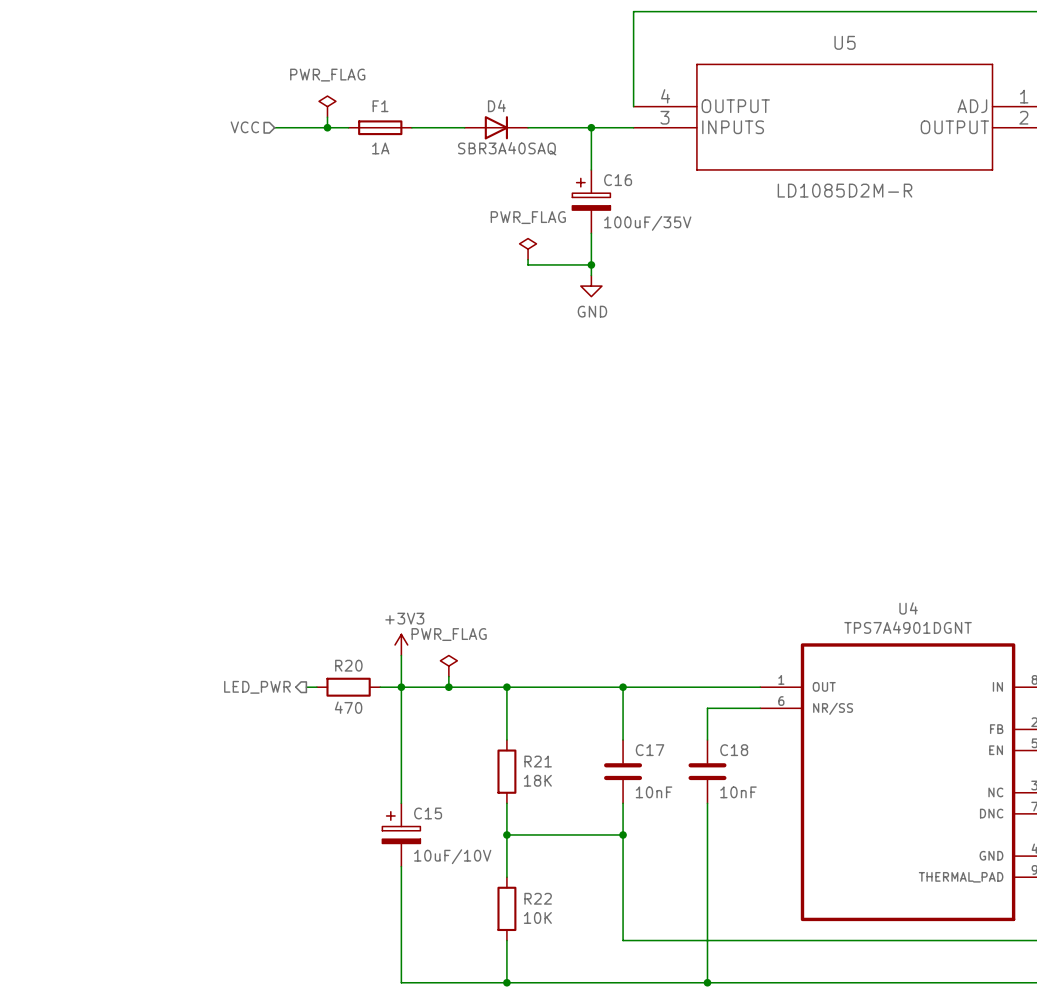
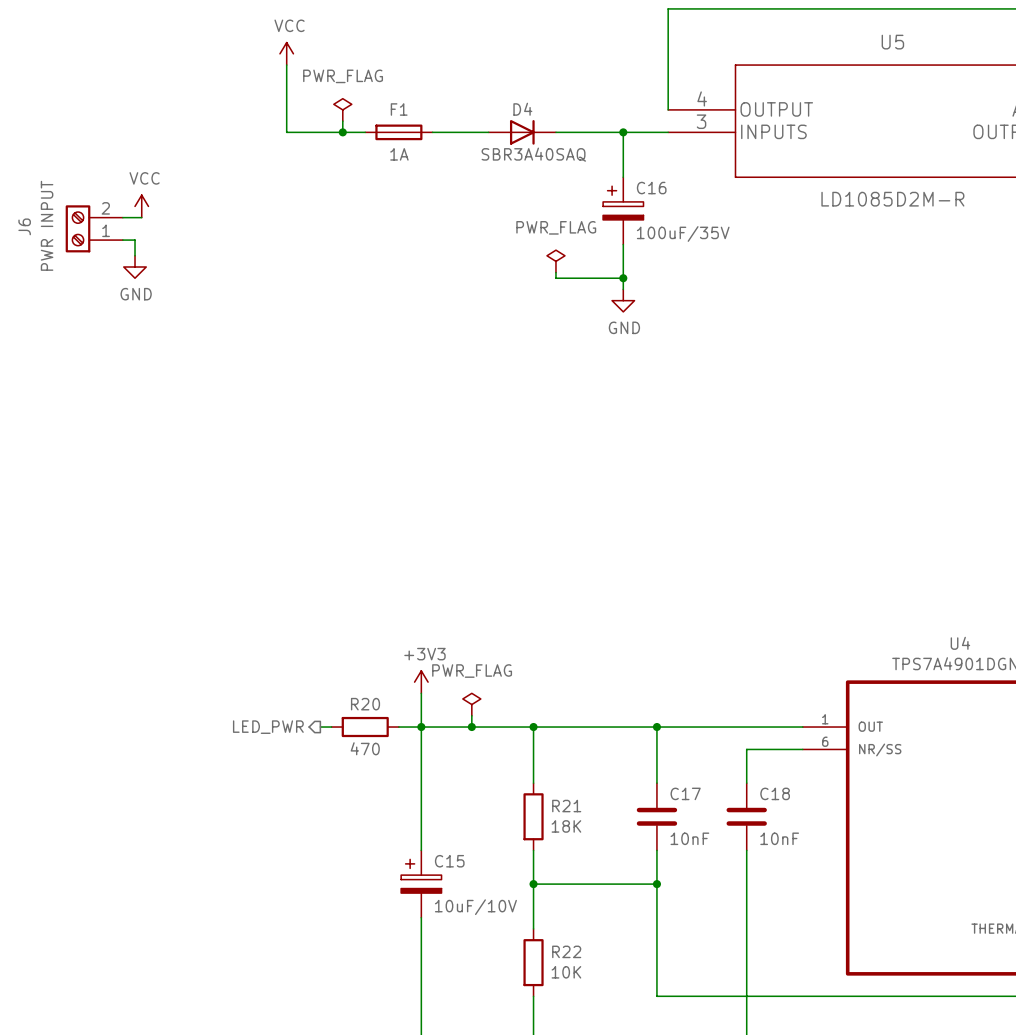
power symbol: none -> VCC (286, 53)
wire: none -> (286, 65) (286, 132)
hierarchical label: VCC (244, 127) -> none
power symbol: none -> VCC (141, 206)
wire: none -> (122, 217) (141, 217)
J6: none -> PWR INPUT (94, 228)
wire: none -> (122, 240) (135, 240) (135, 255)
power symbol: none -> GND (135, 267)

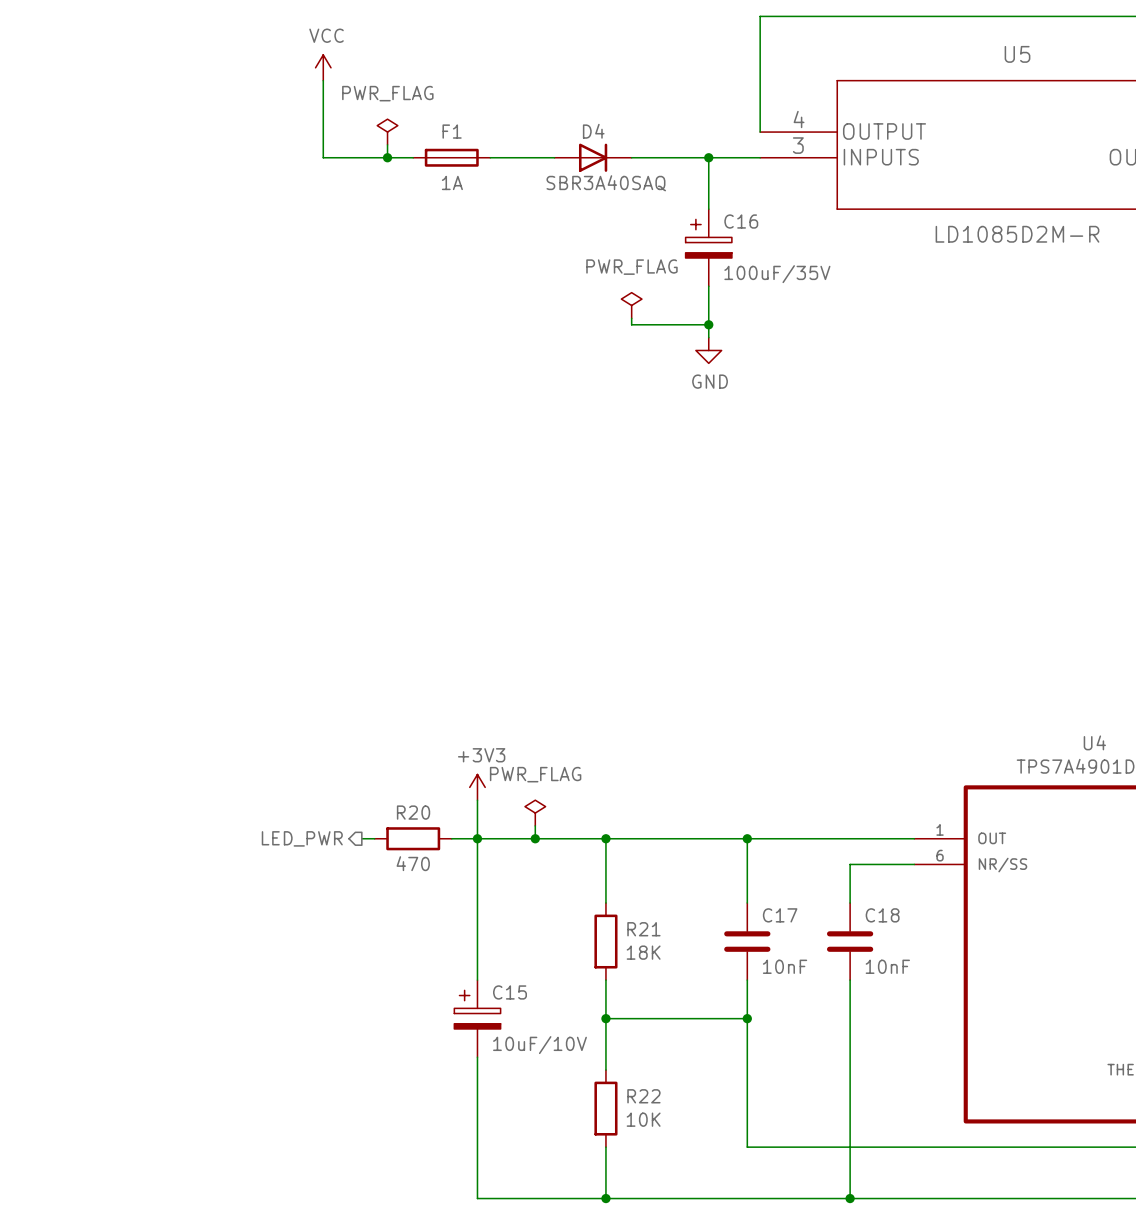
power symbol: VCC (141, 206) -> none
wire: (122, 217) (141, 217) -> none
J6: PWR INPUT (94, 228) -> none
wire: (122, 240) (135, 240) (135, 255) -> none
power symbol: GND (135, 267) -> none

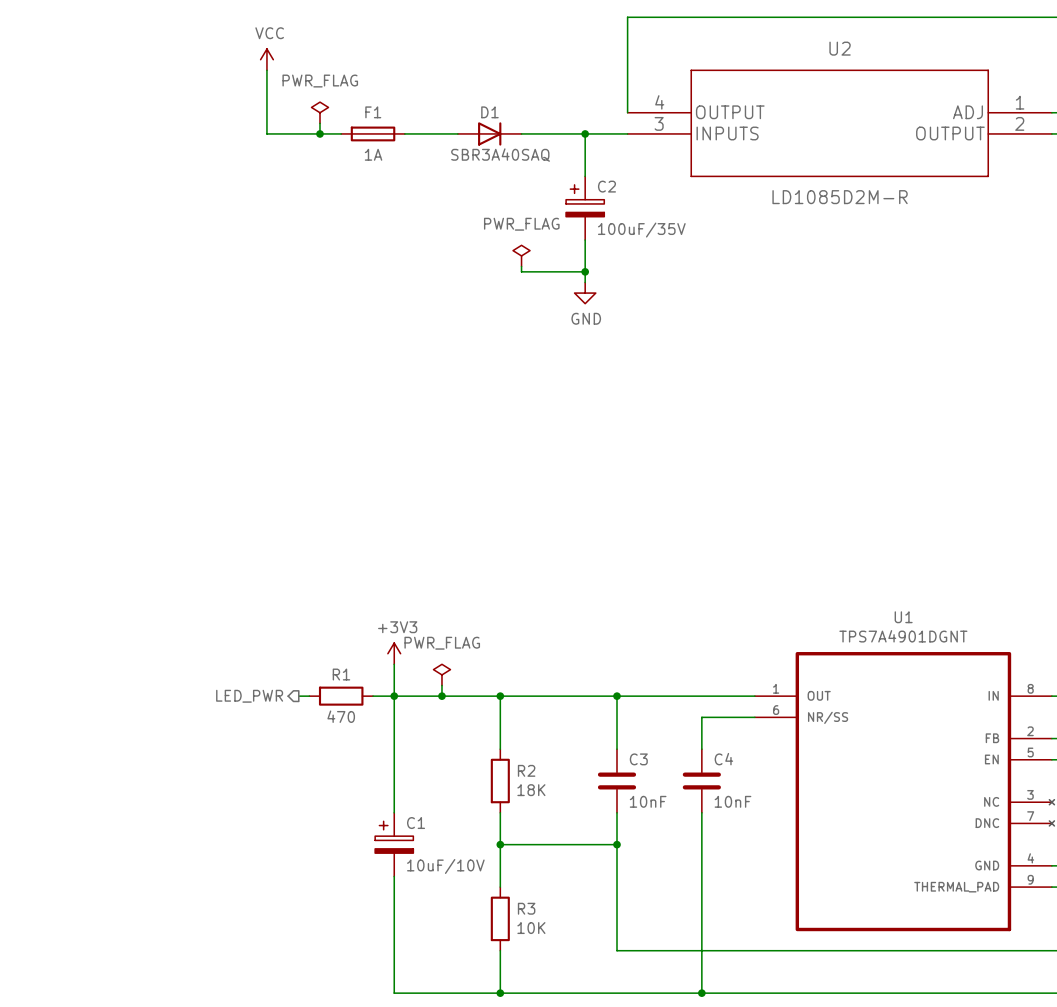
U5 name: U5 (1017, 54) -> U2 (840, 48)
D4 name: D4 (593, 131) -> D1 (489, 112)
C16 name: C16 (741, 221) -> C2 (606, 186)
U4 name: U4 (1094, 742) -> U1 (903, 617)
R20 name: R20 (413, 812) -> R1 (341, 674)
C17 name: C17 (780, 915) -> C3 (638, 759)
C18 name: C18 (882, 915) -> C4 (723, 759)
R21 name: R21 (643, 929) -> R2 (526, 770)
C15 name: C15 (510, 992) -> C1 (416, 823)
R22 name: R22 (643, 1096) -> R3 (526, 908)

